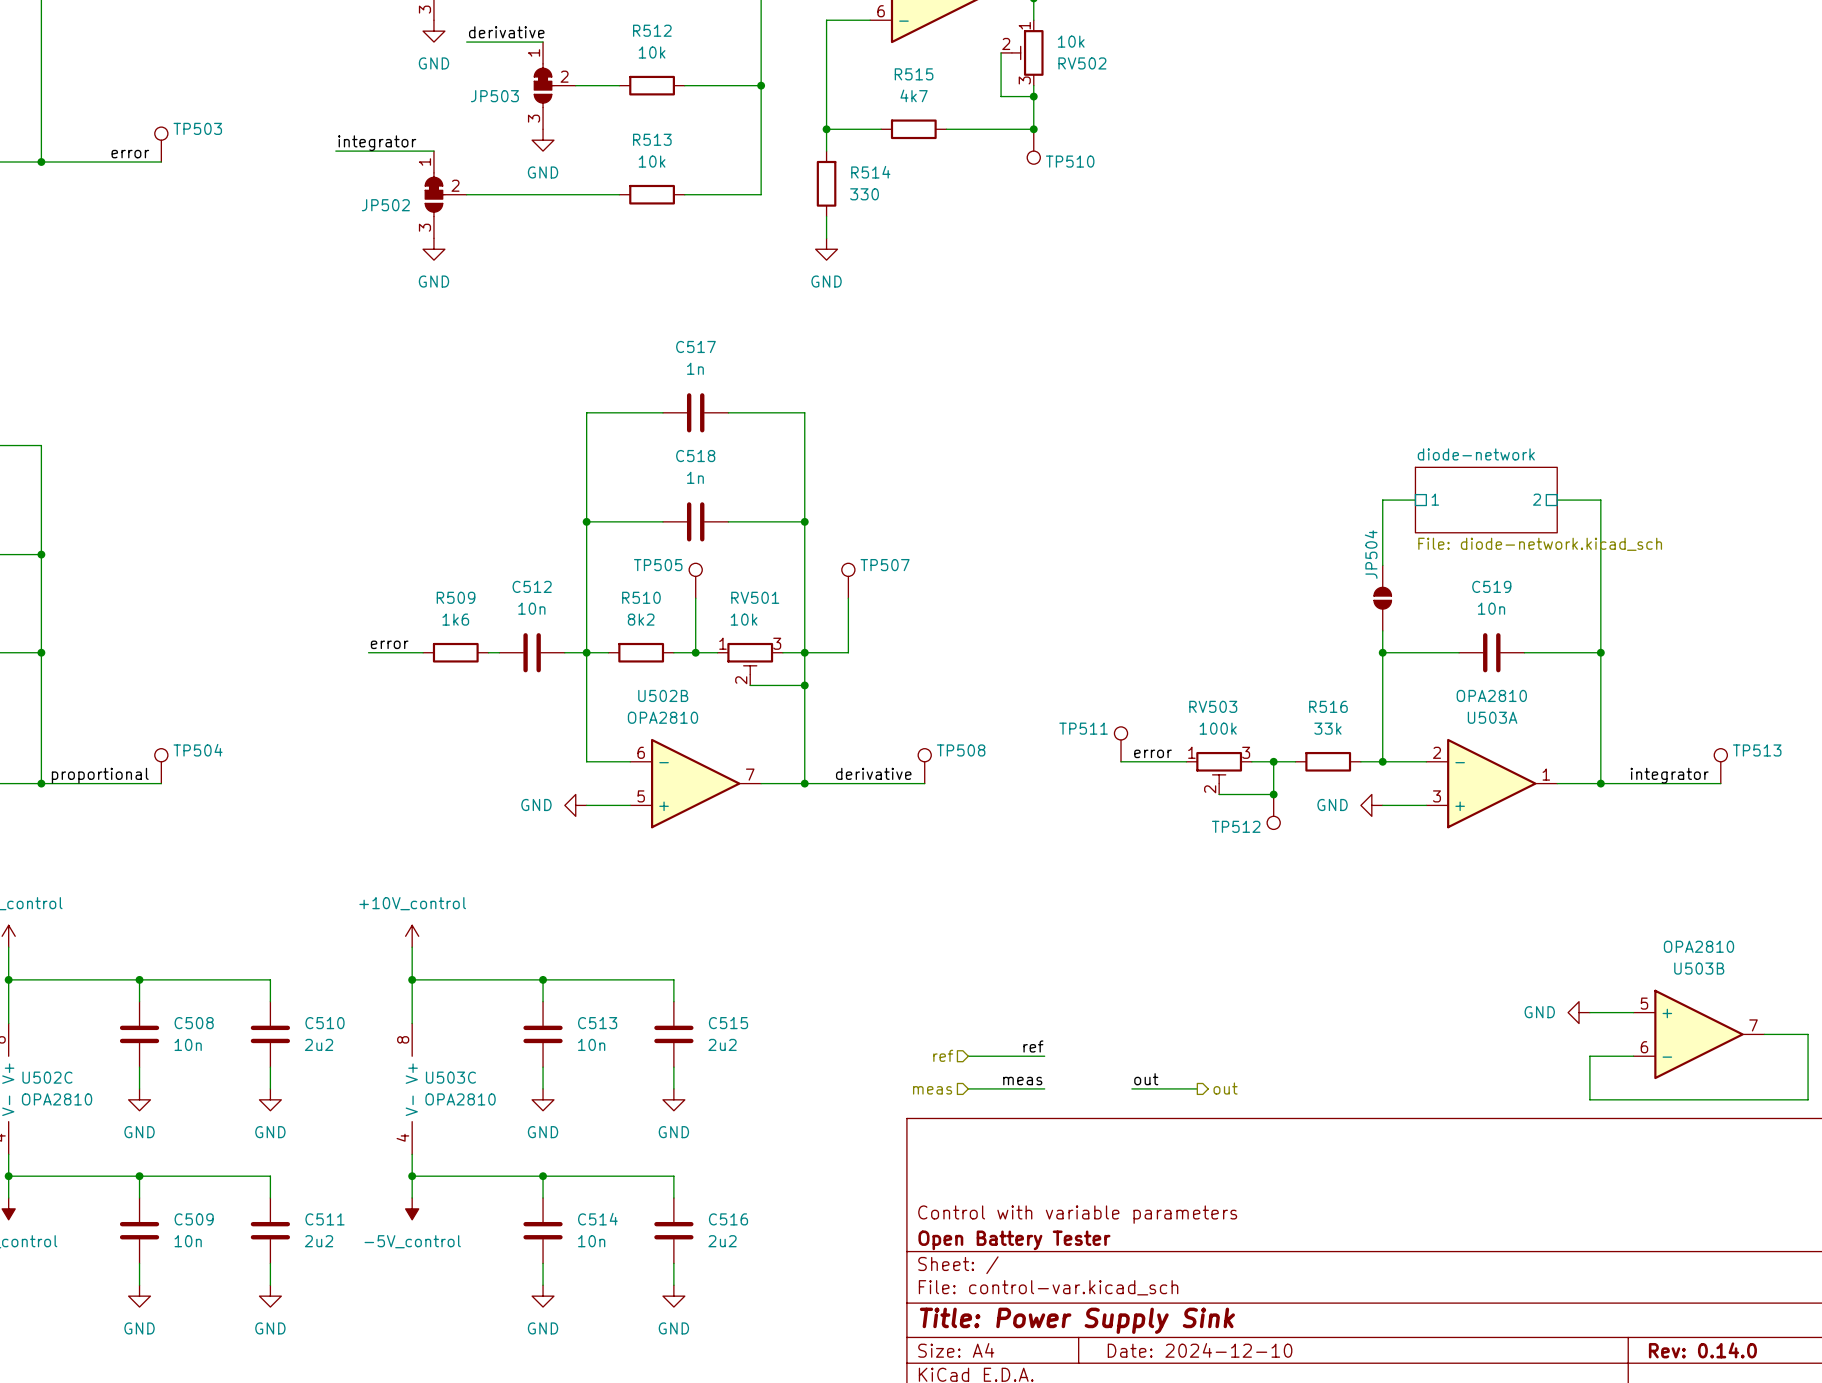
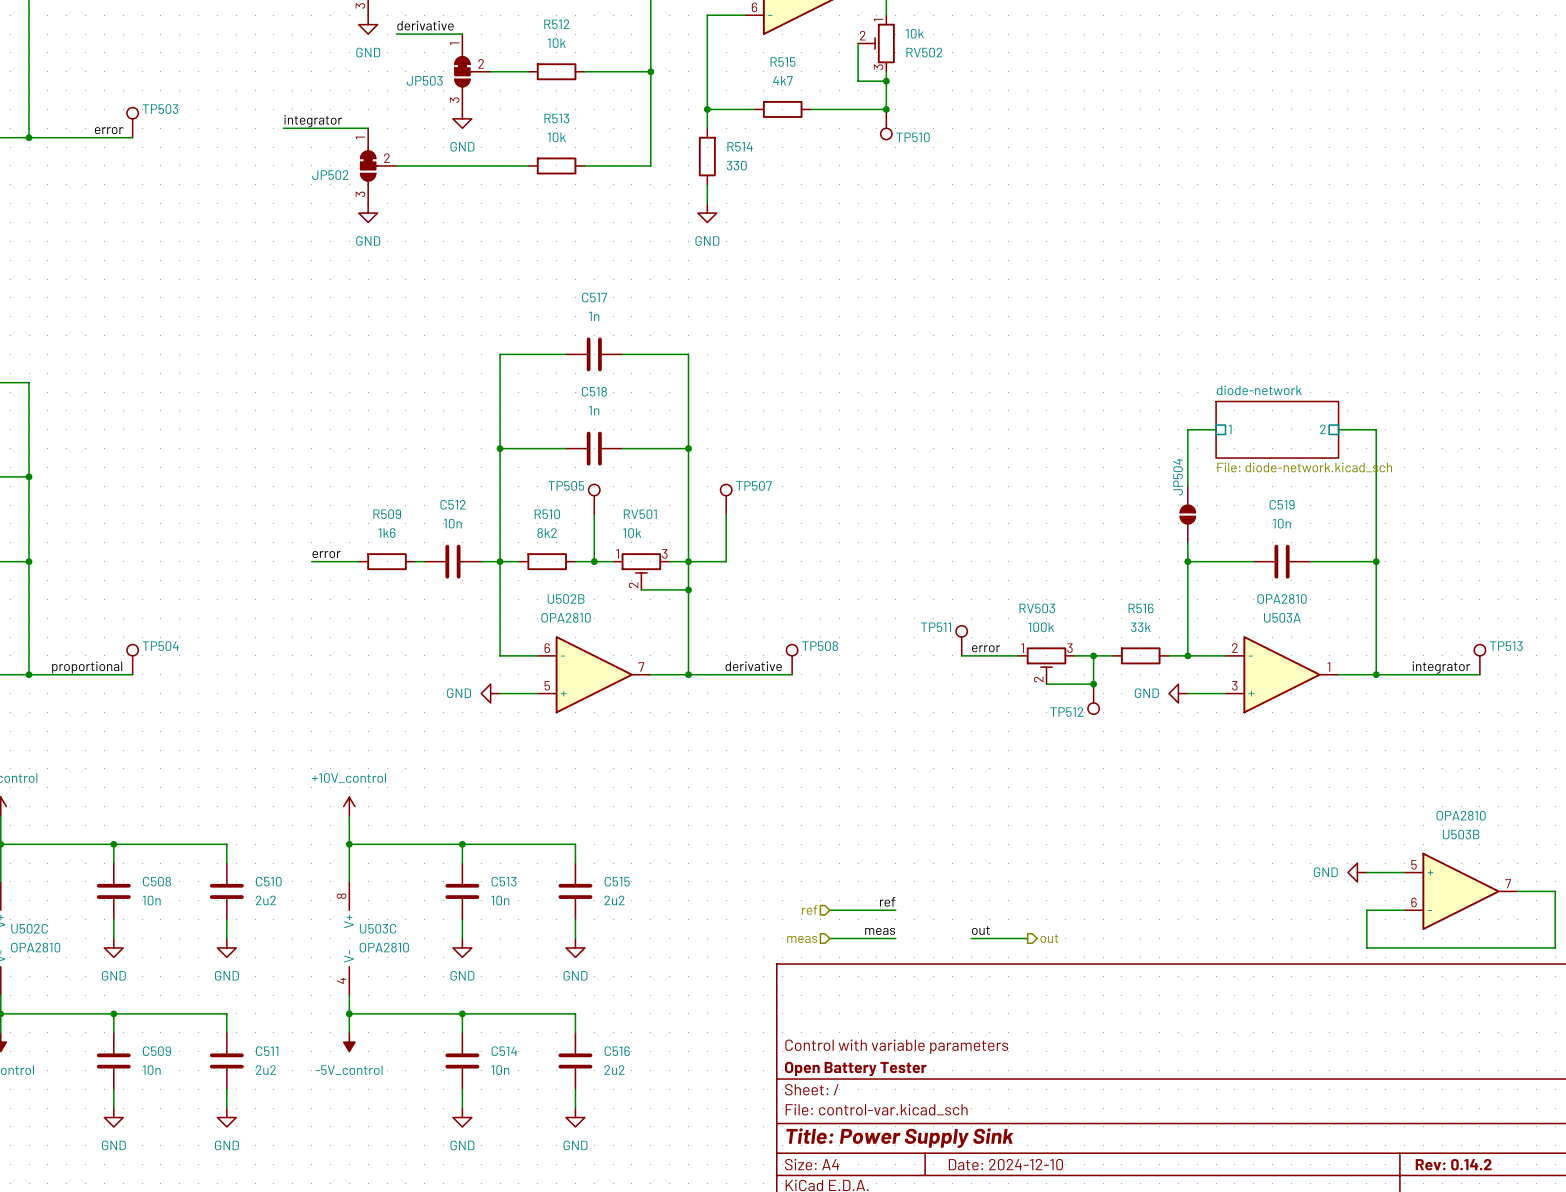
title block: Rev: 0.14.0 (1702, 1350) -> Rev: 0.14.2 (1453, 1164)

